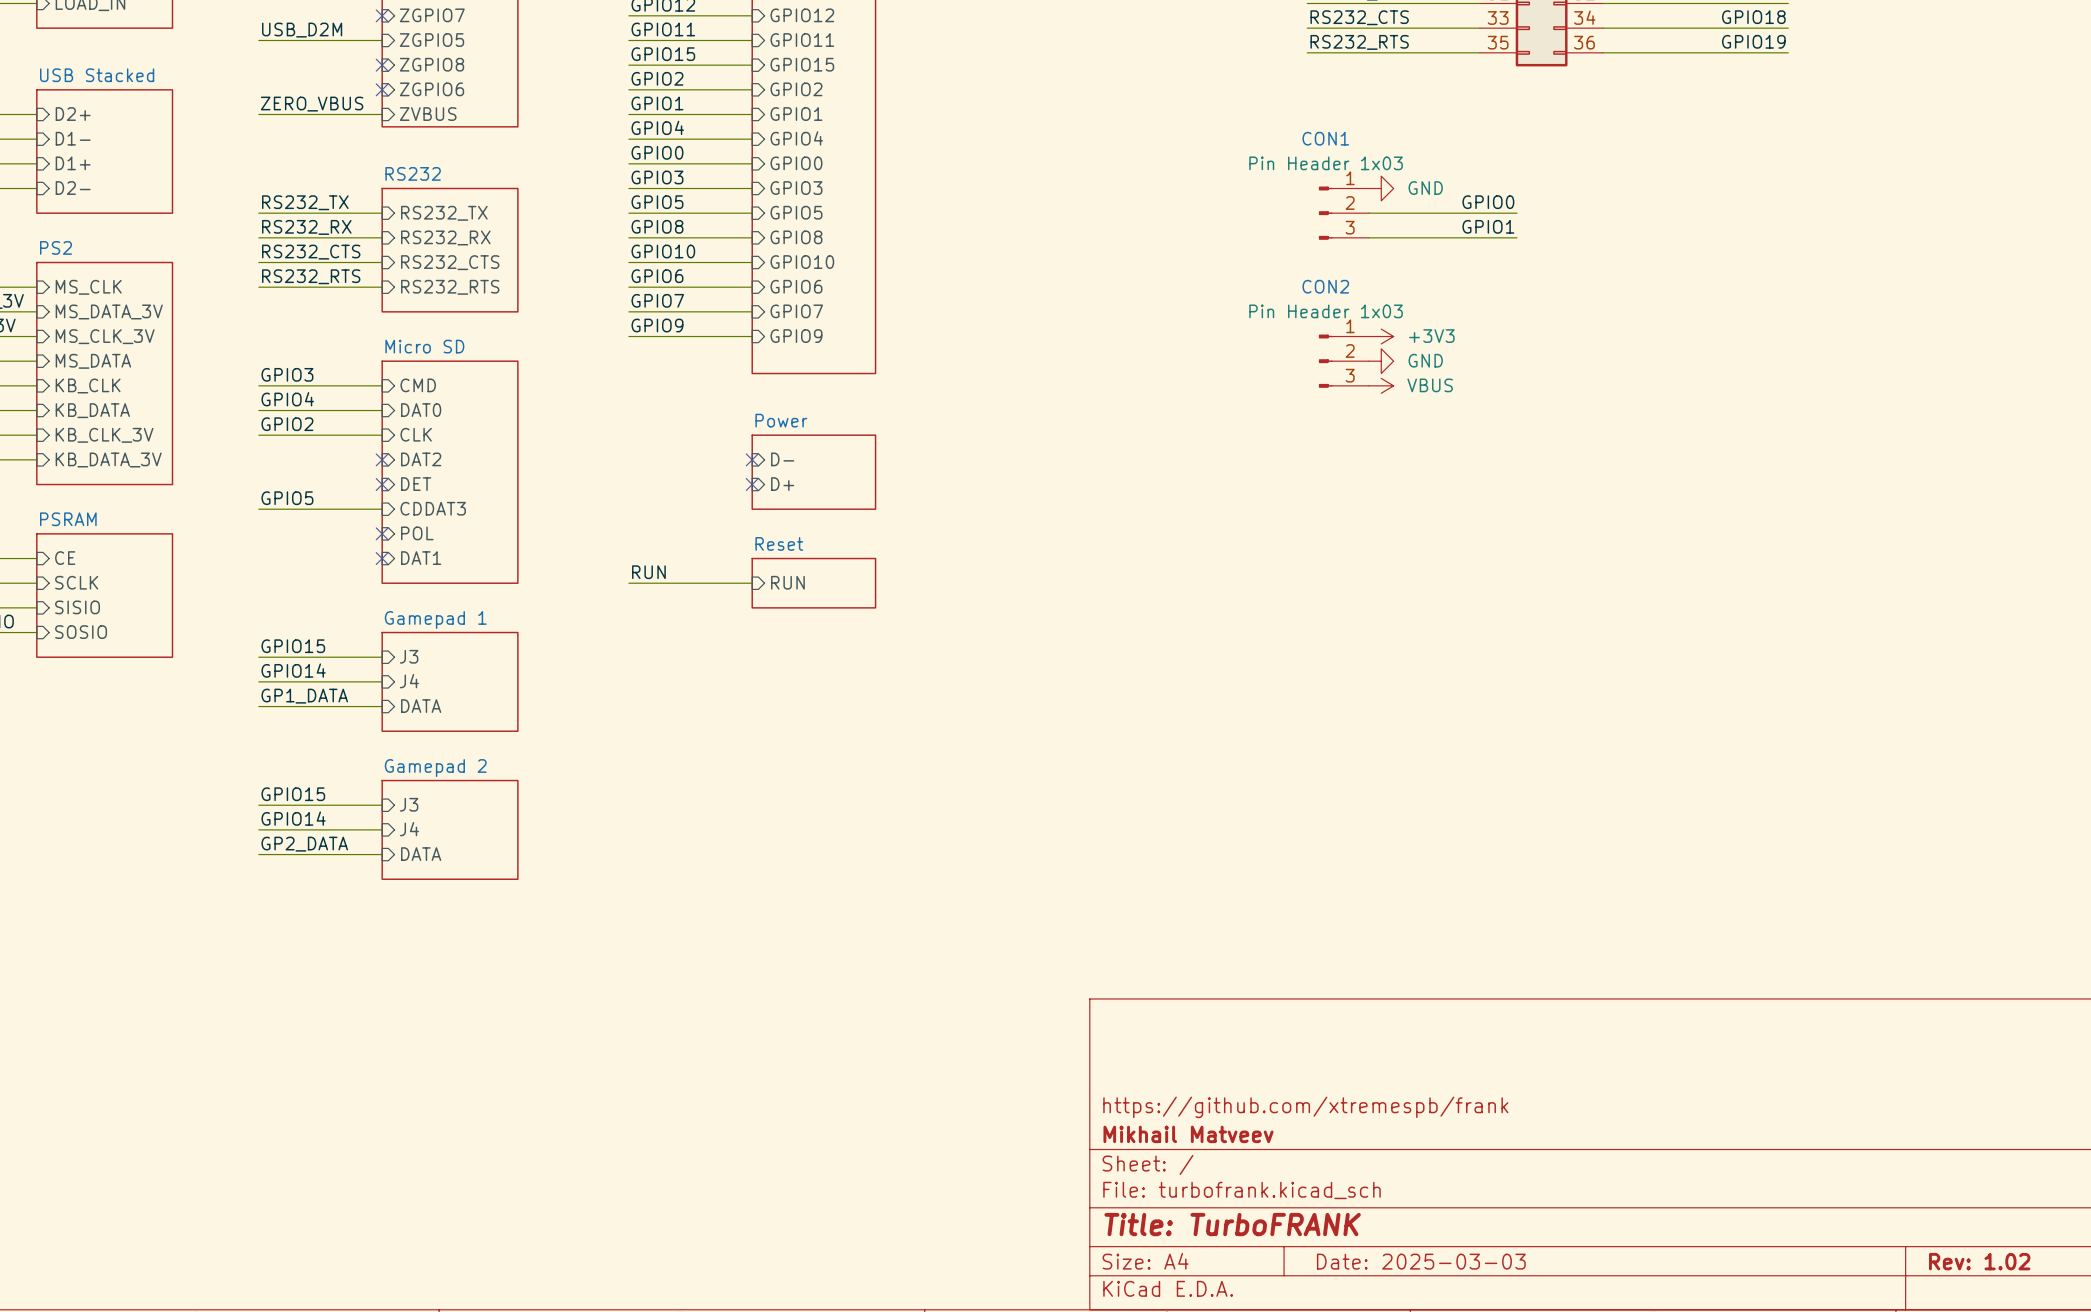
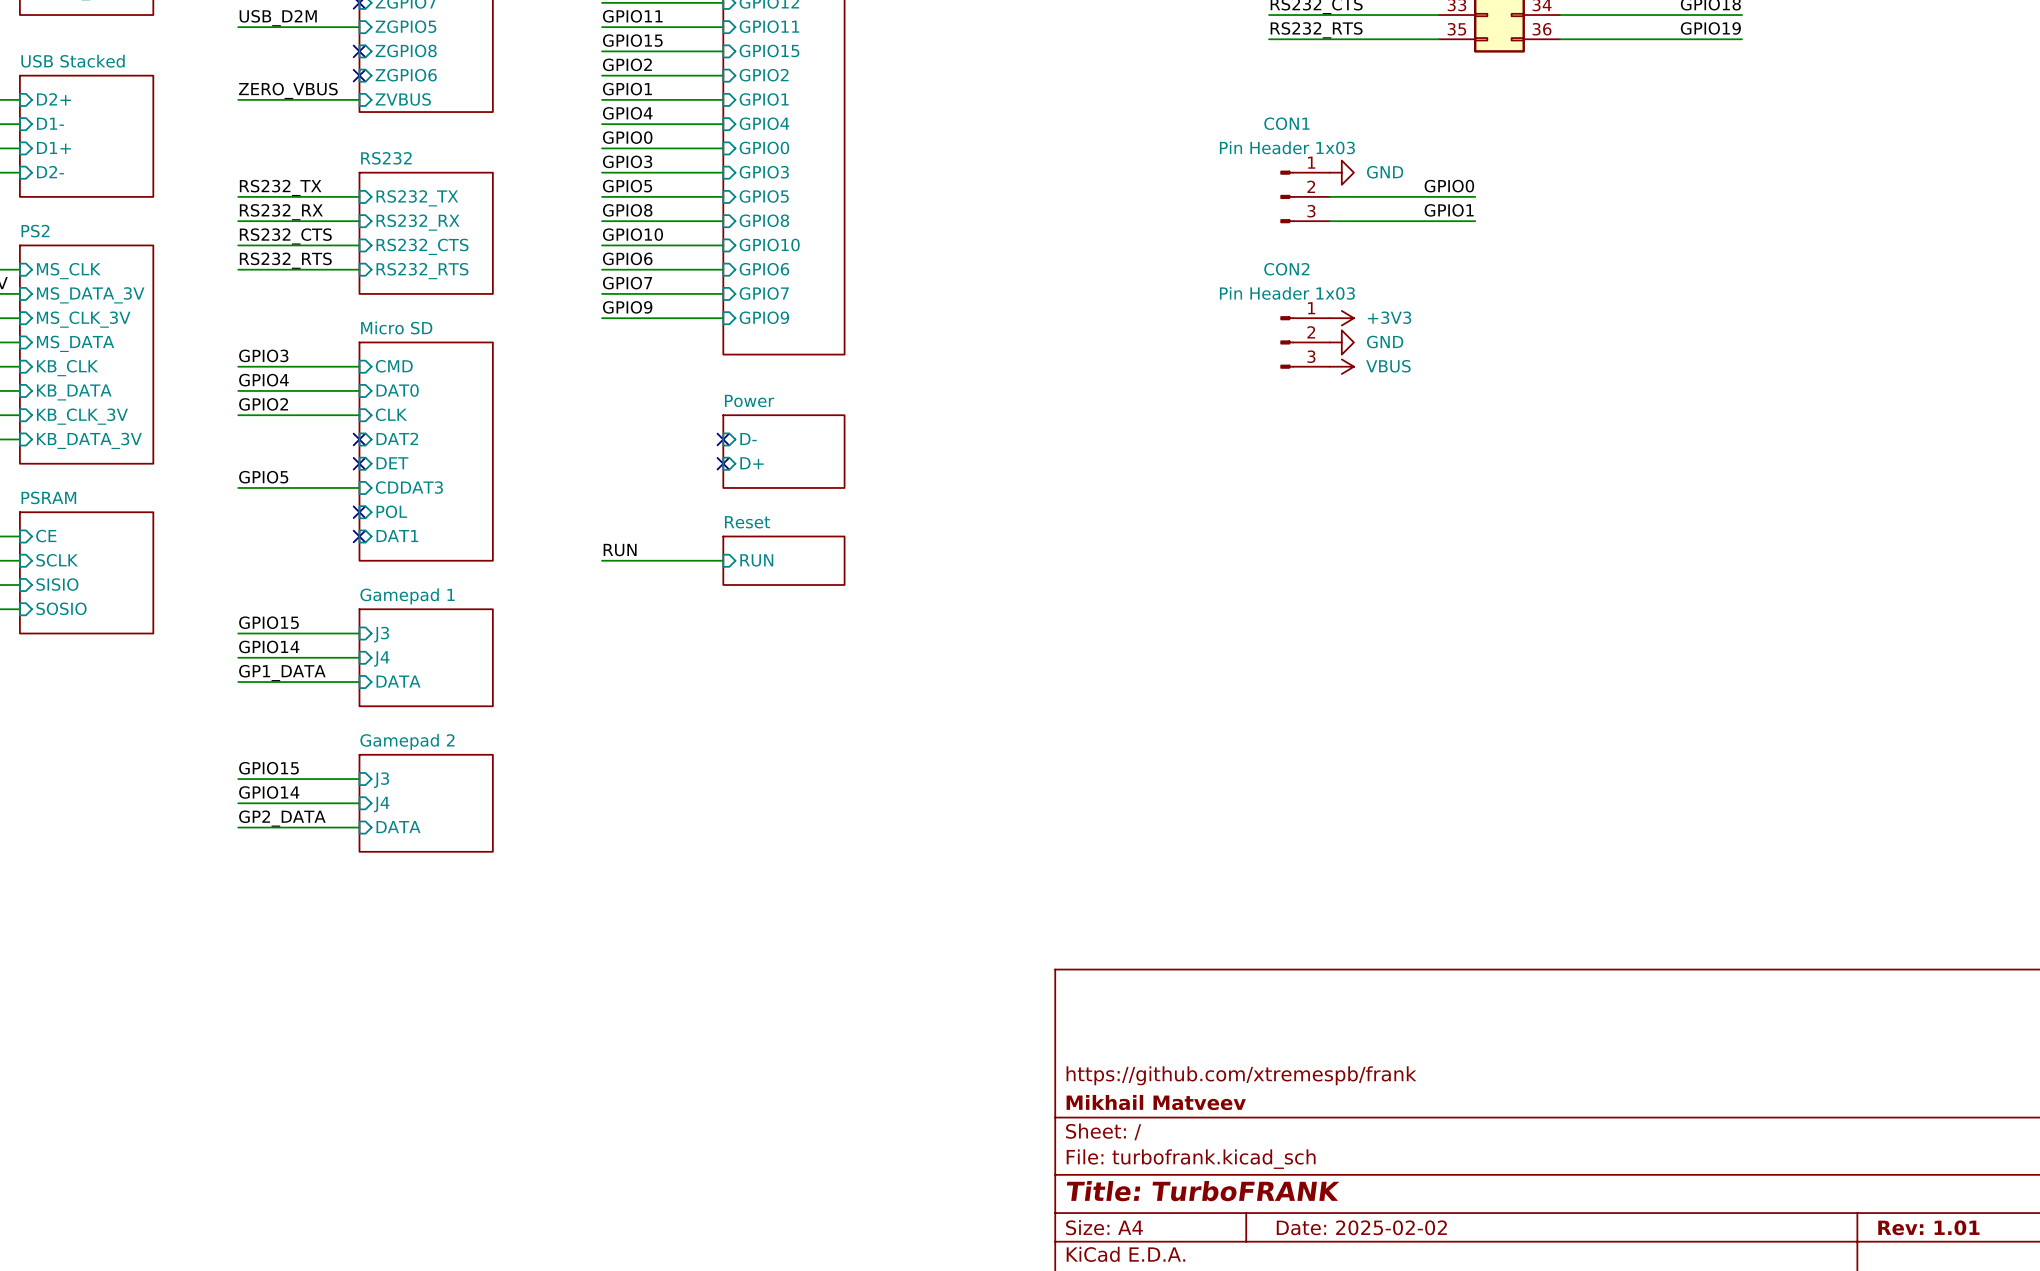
title block: Date: 2025-03-03 (1421, 1261) -> Date: 2025-02-02 (1361, 1227)
title block: Rev: 1.02 (1979, 1261) -> Rev: 1.01 (1928, 1227)

